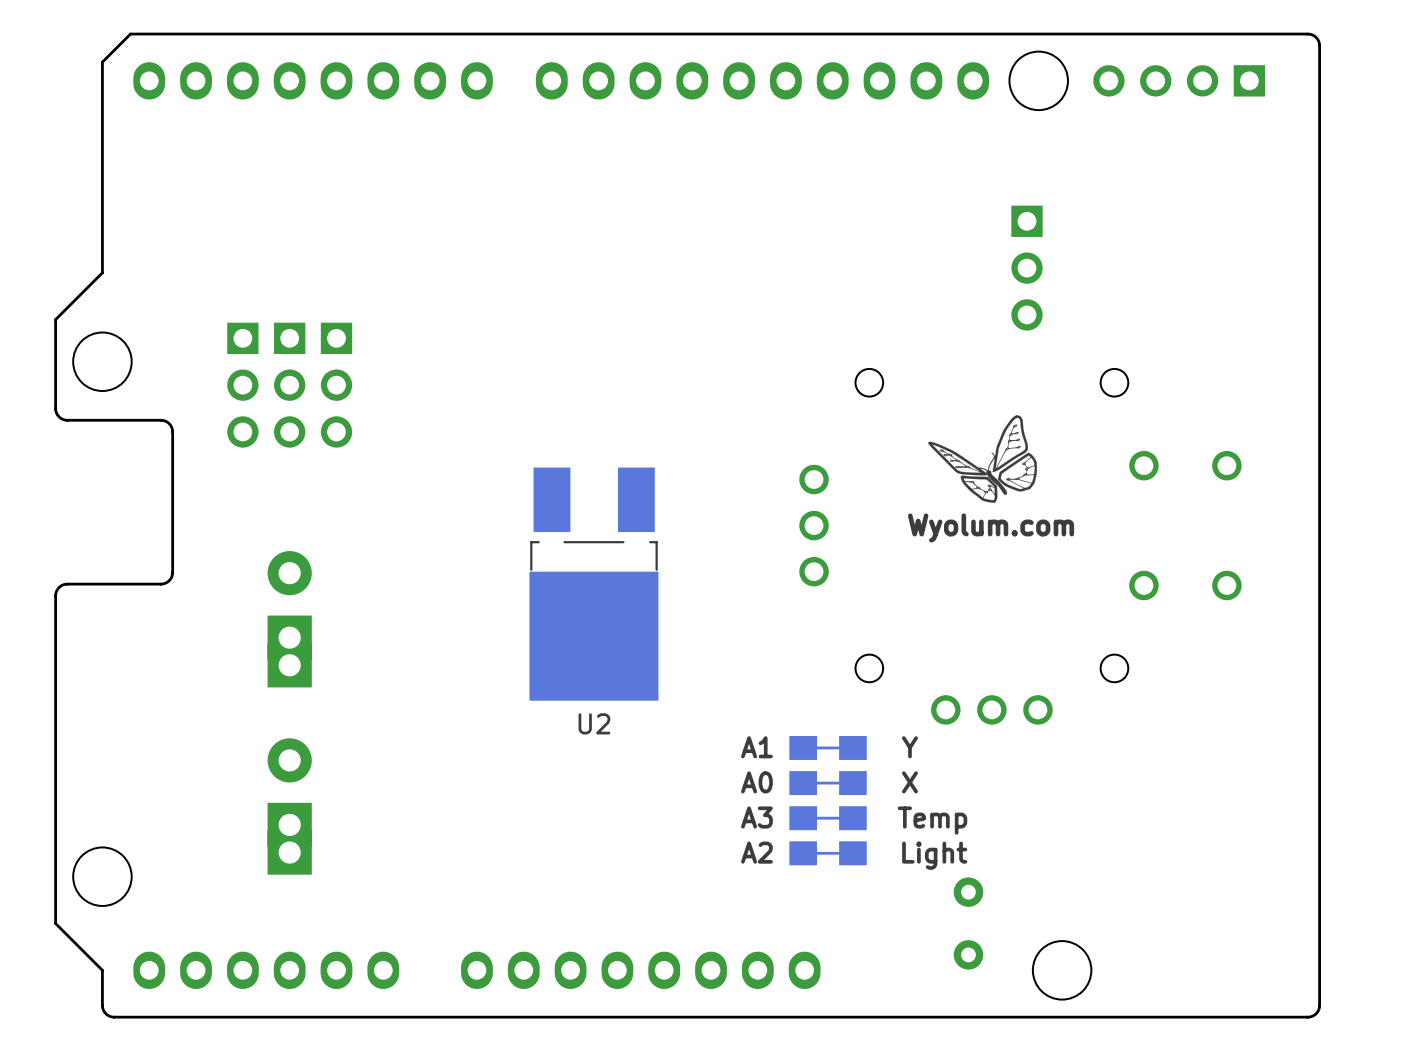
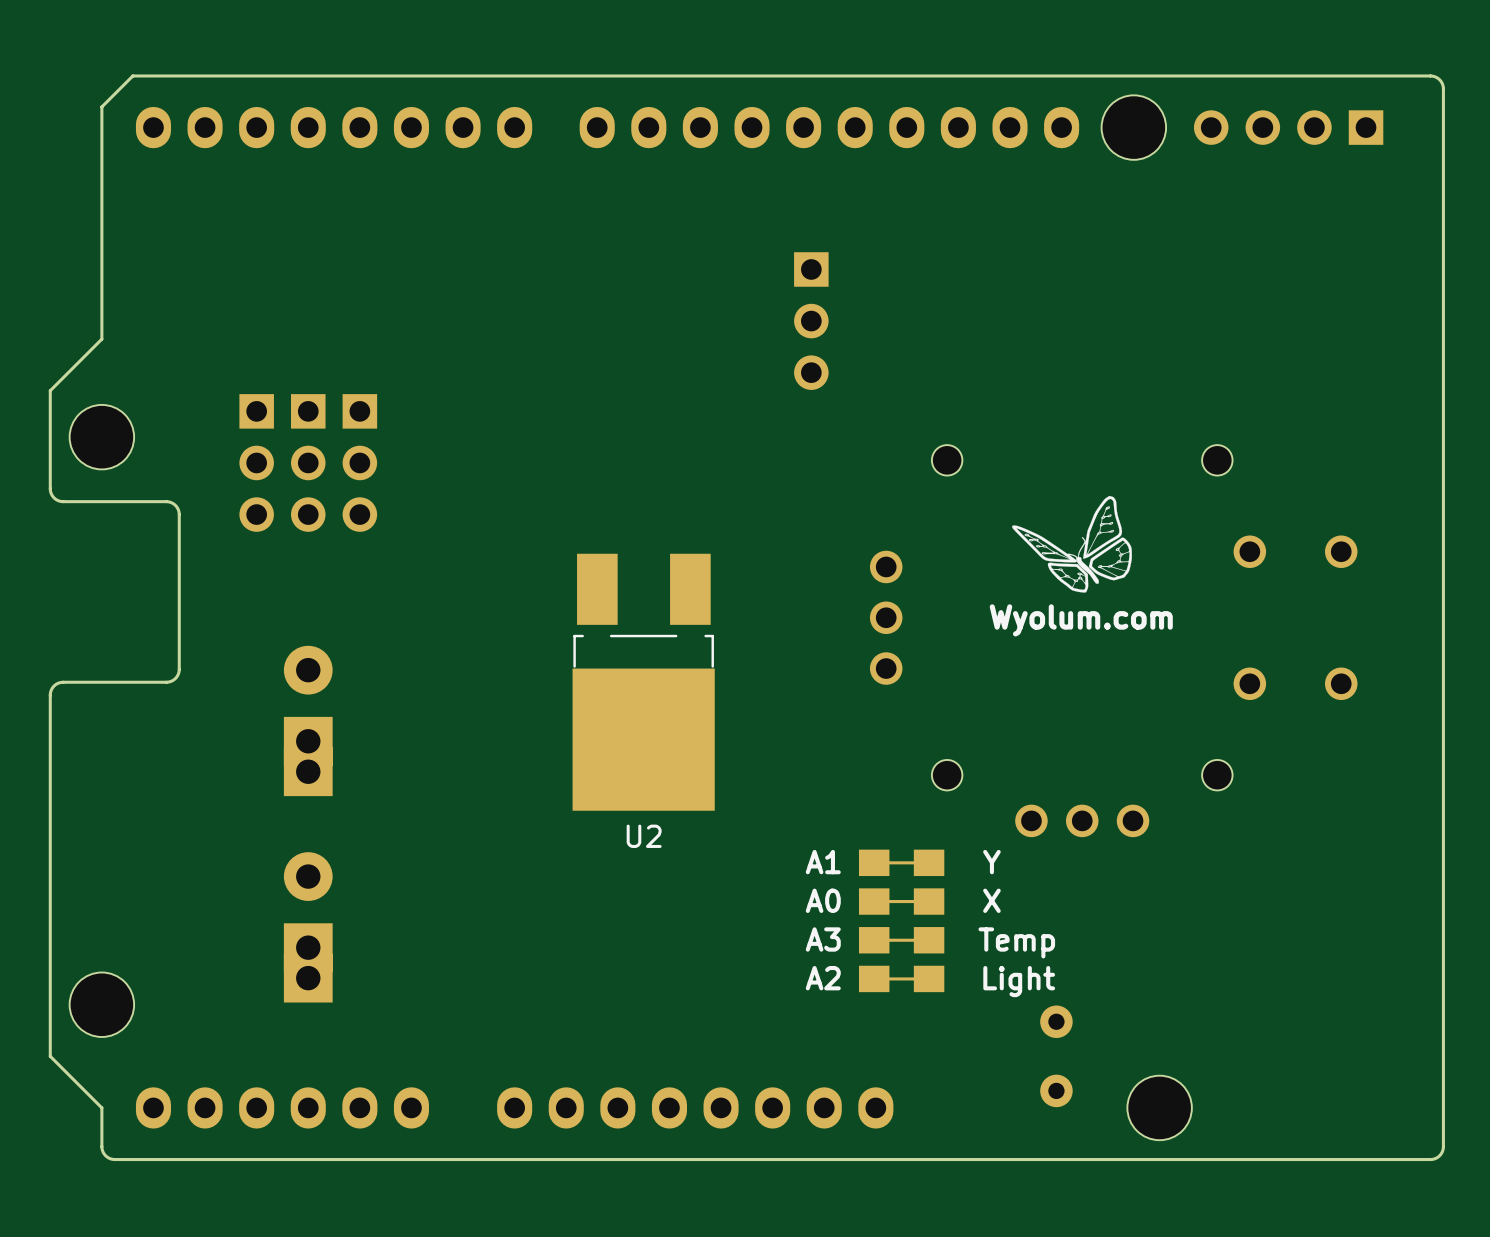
part position: (1027, 268) -> (811, 321)

